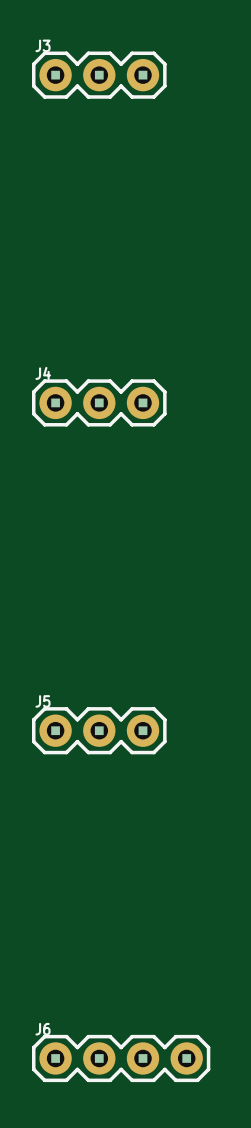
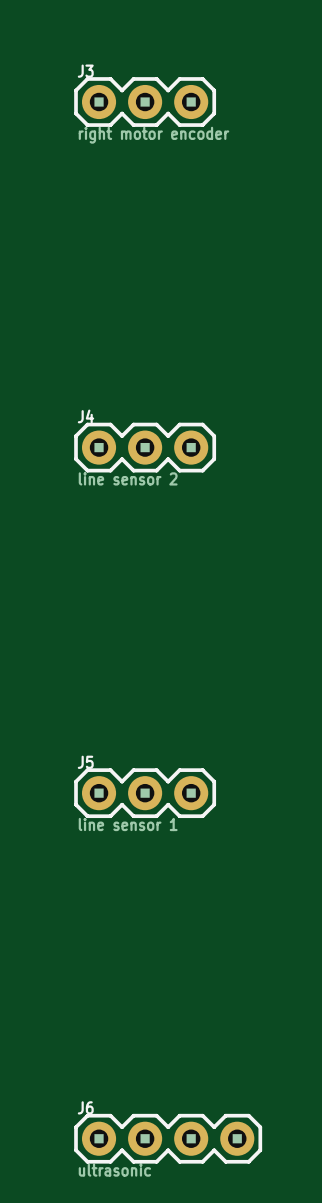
J3 value: none -> right motor encoder (153, 135)
J4 value: none -> line sensor 2 (128, 478)
J5 value: none -> line sensor 1 (128, 824)
J6 value: none -> ultrasonic (114, 1170)

